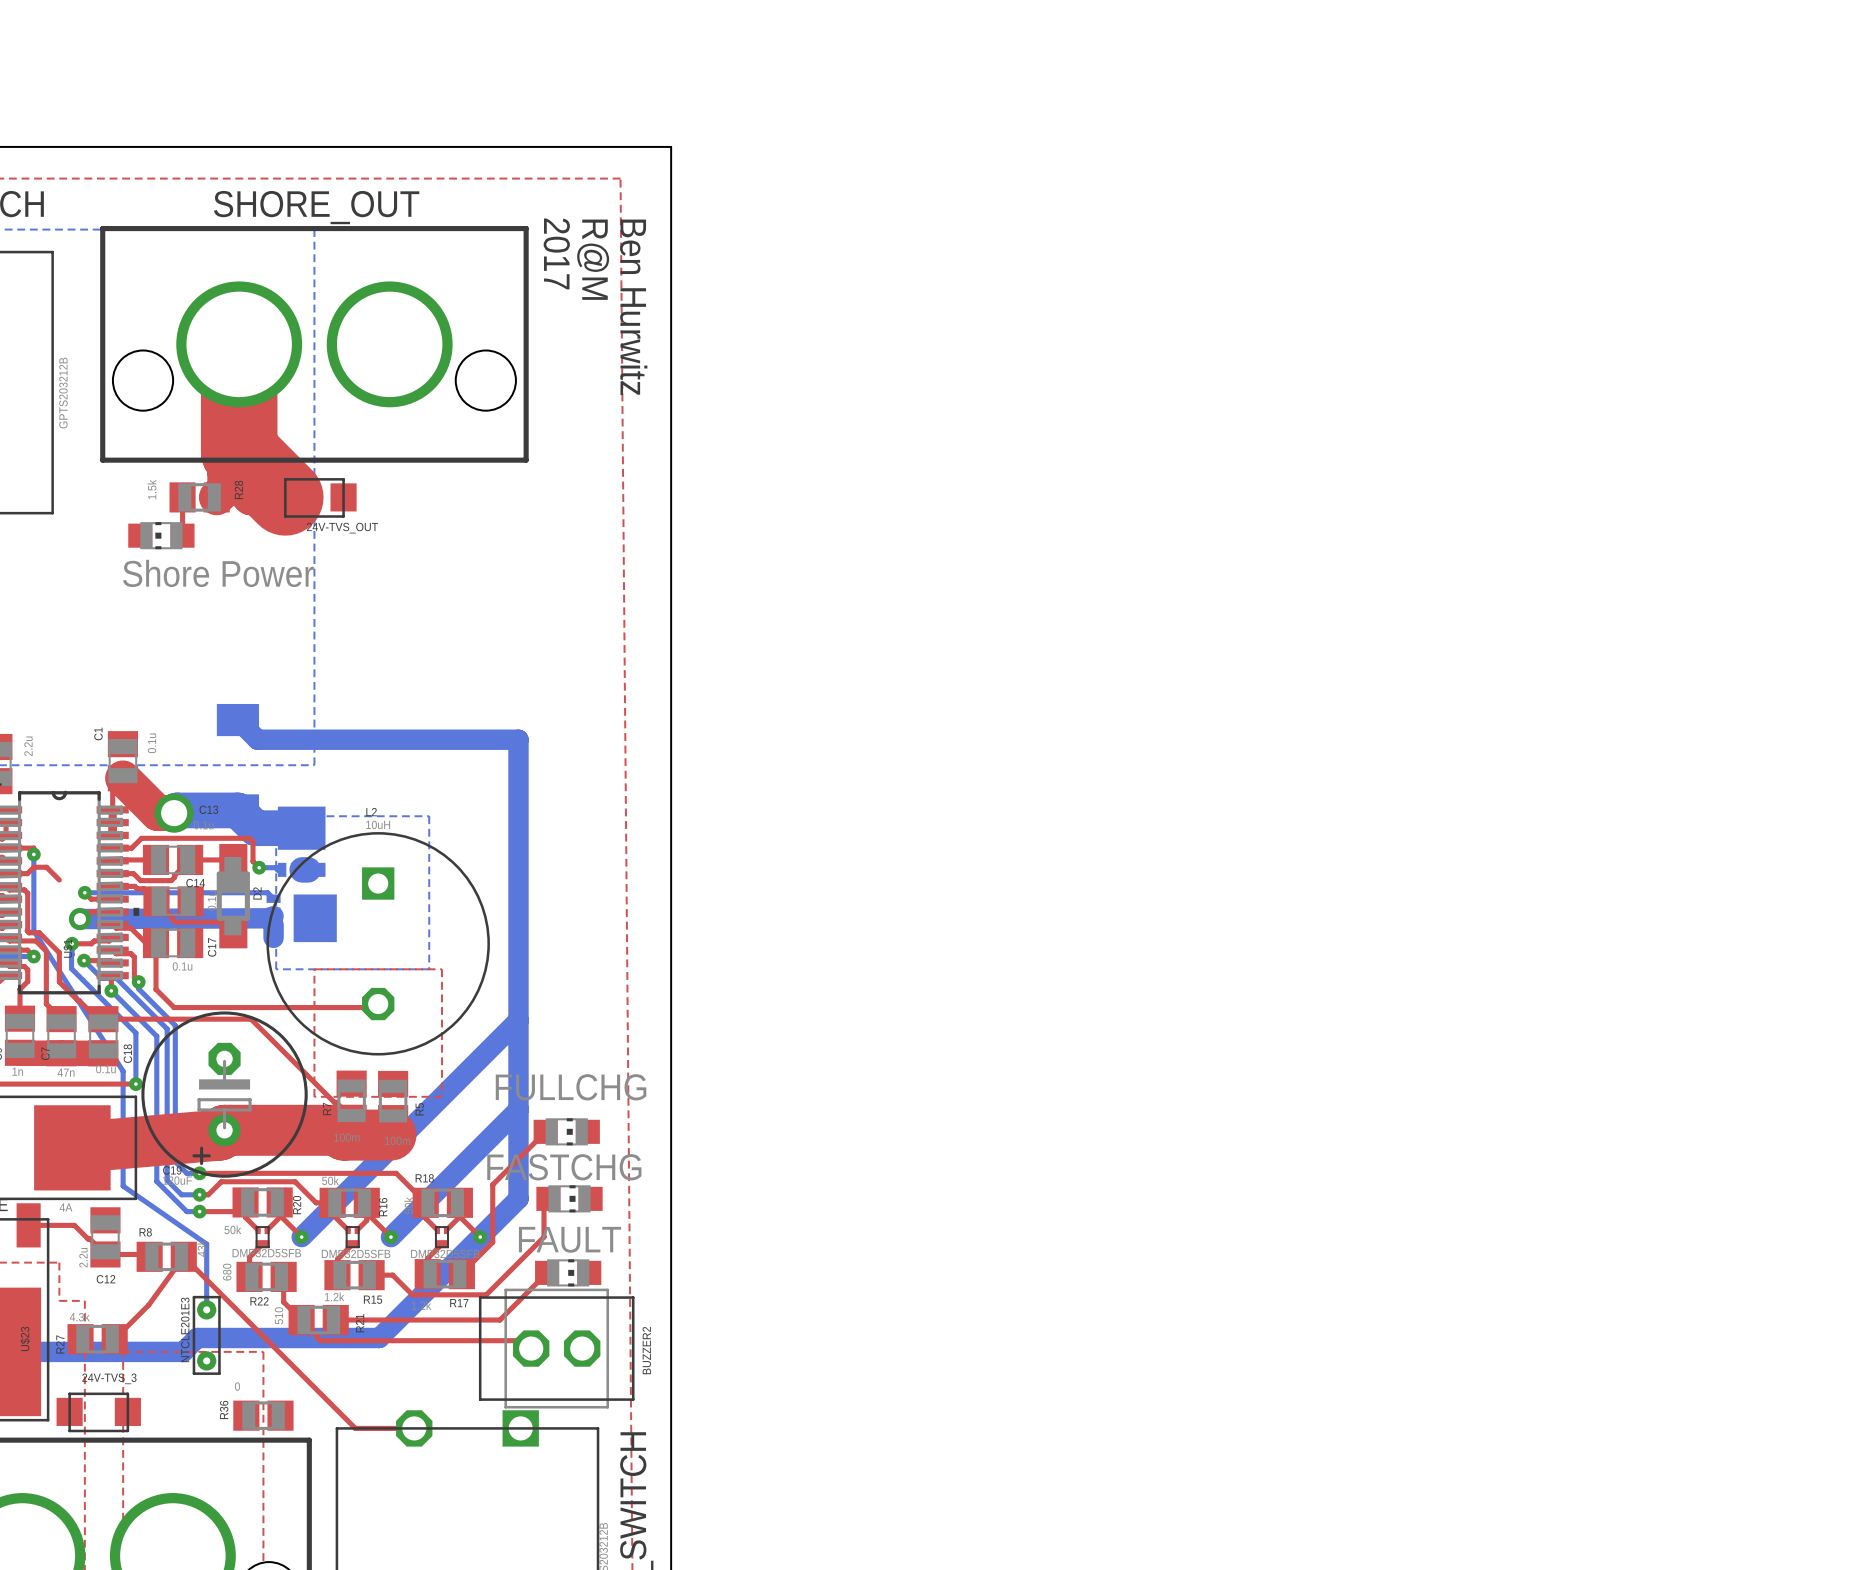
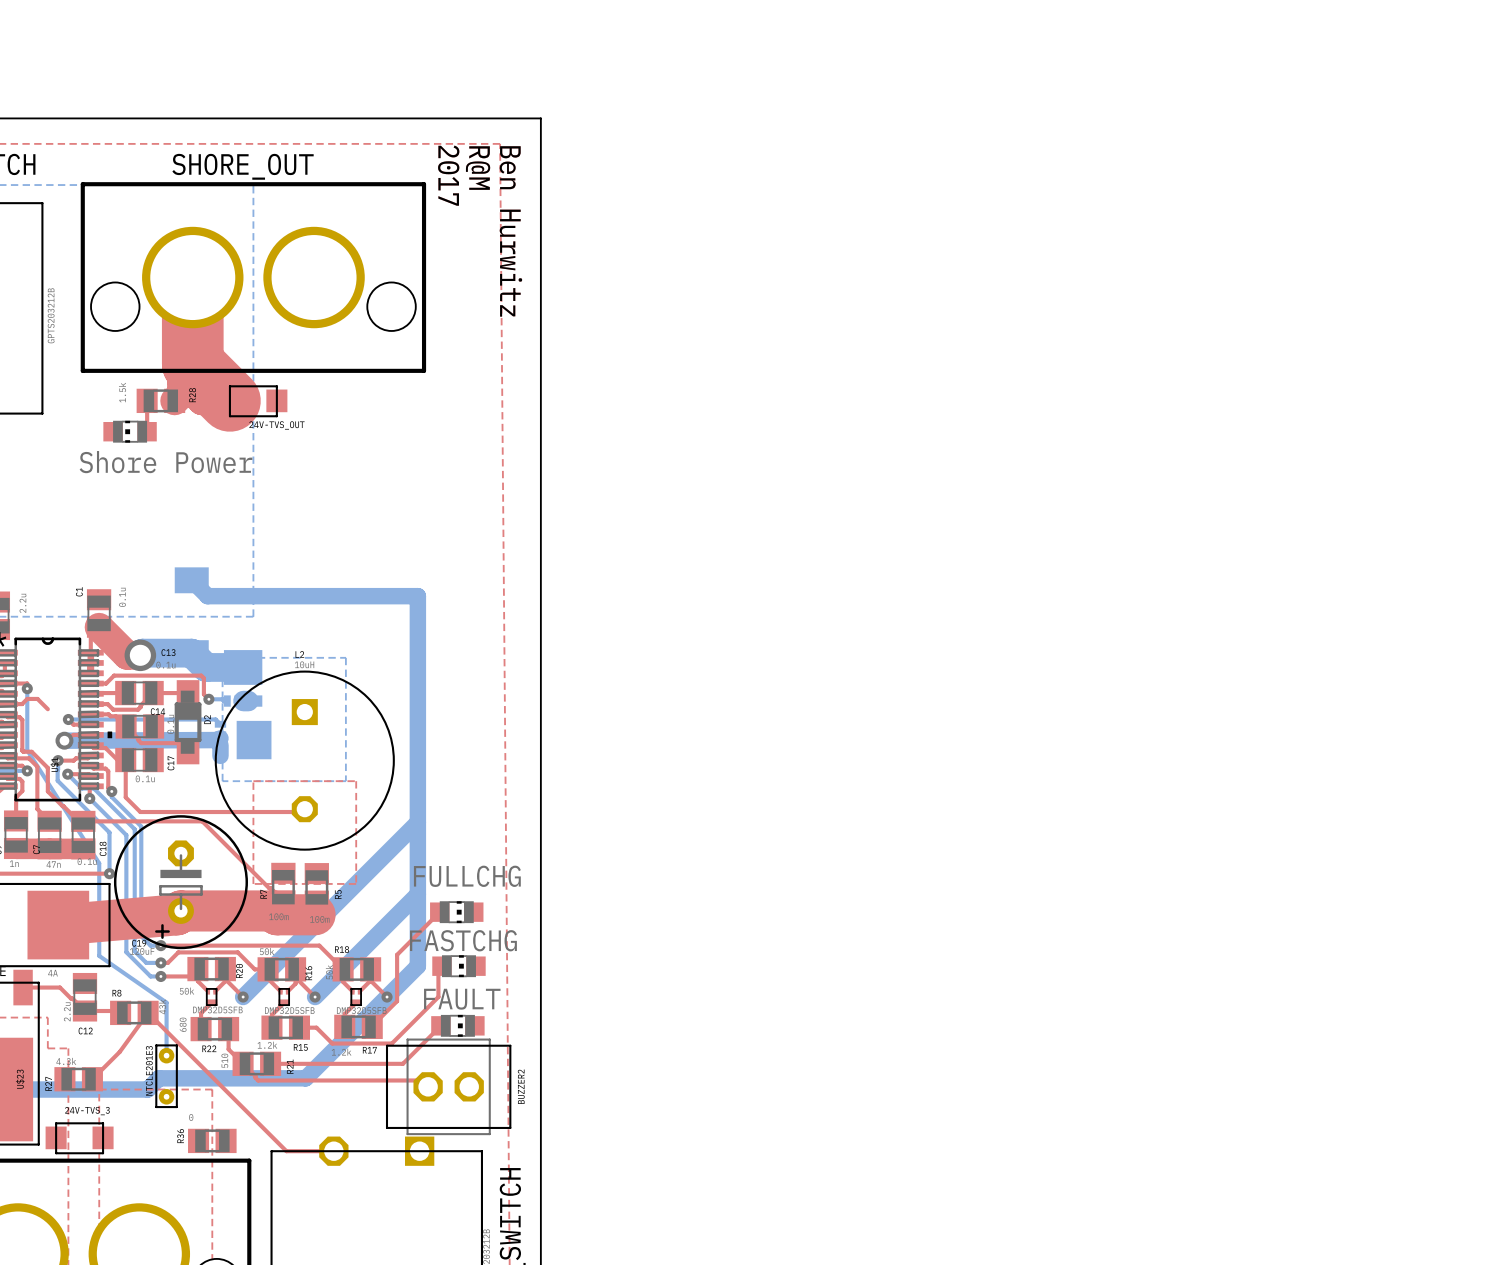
text: none -> 2017 (448, 175)
text: none -> R@M (478, 168)
text: 2017 (556, 253) -> none
text: R@M (593, 259) -> none
text: none -> Ben Hurwitz (510, 231)
text: Ben Hurwitz (633, 307) -> none

